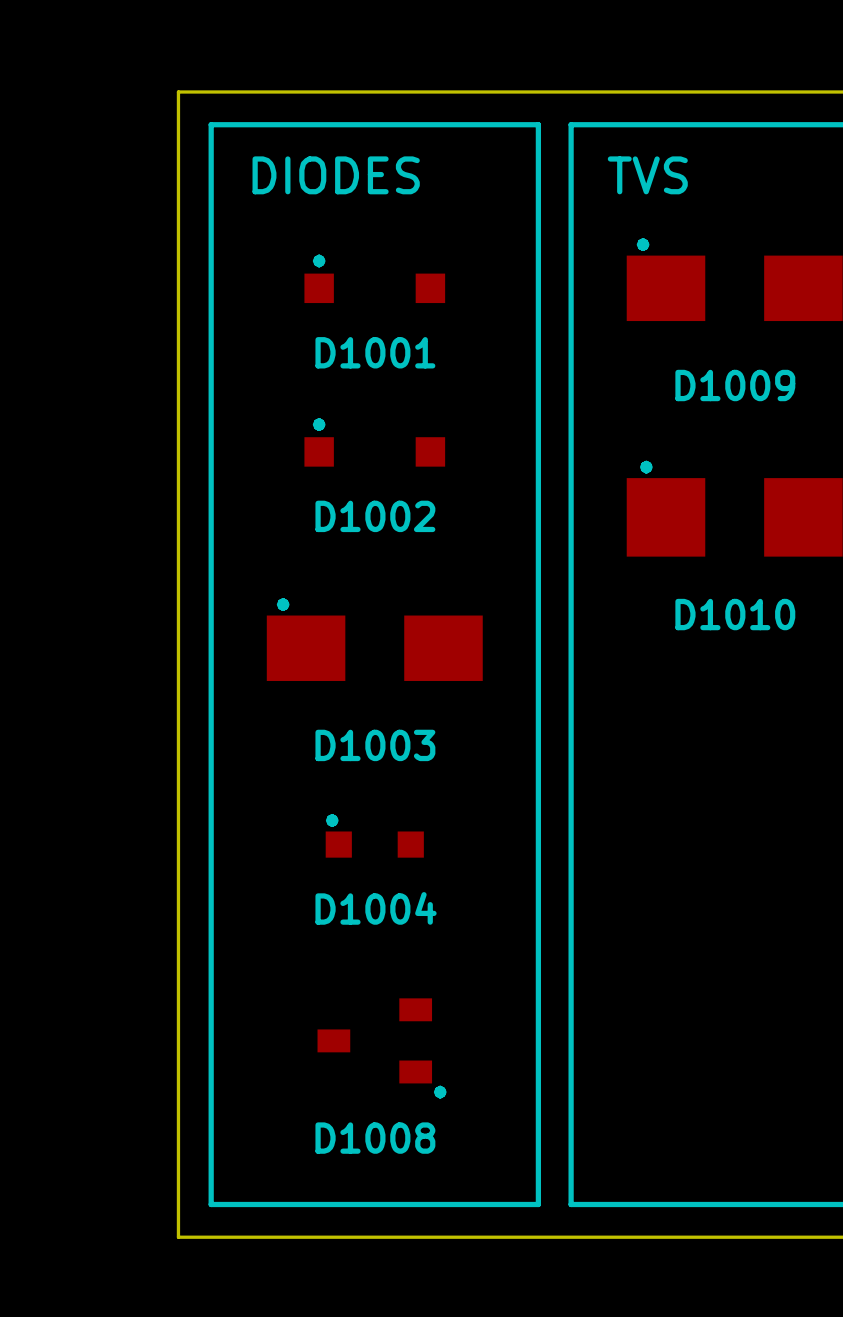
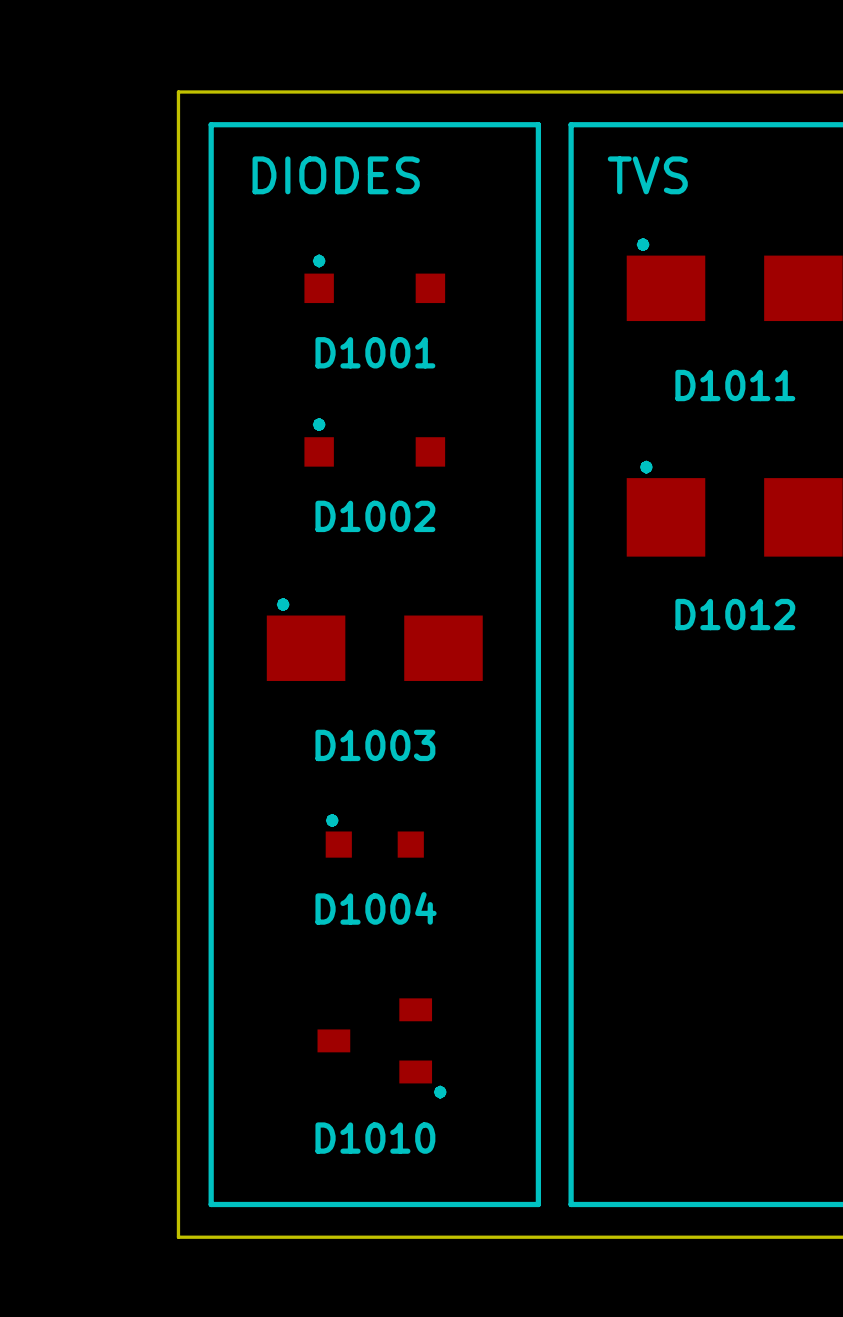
D1009 name: D1009 (735, 385) -> D1011 (735, 385)
D1010 name: D1010 (735, 614) -> D1012 (735, 614)
D1008 name: D1008 (375, 1138) -> D1010 (375, 1138)

